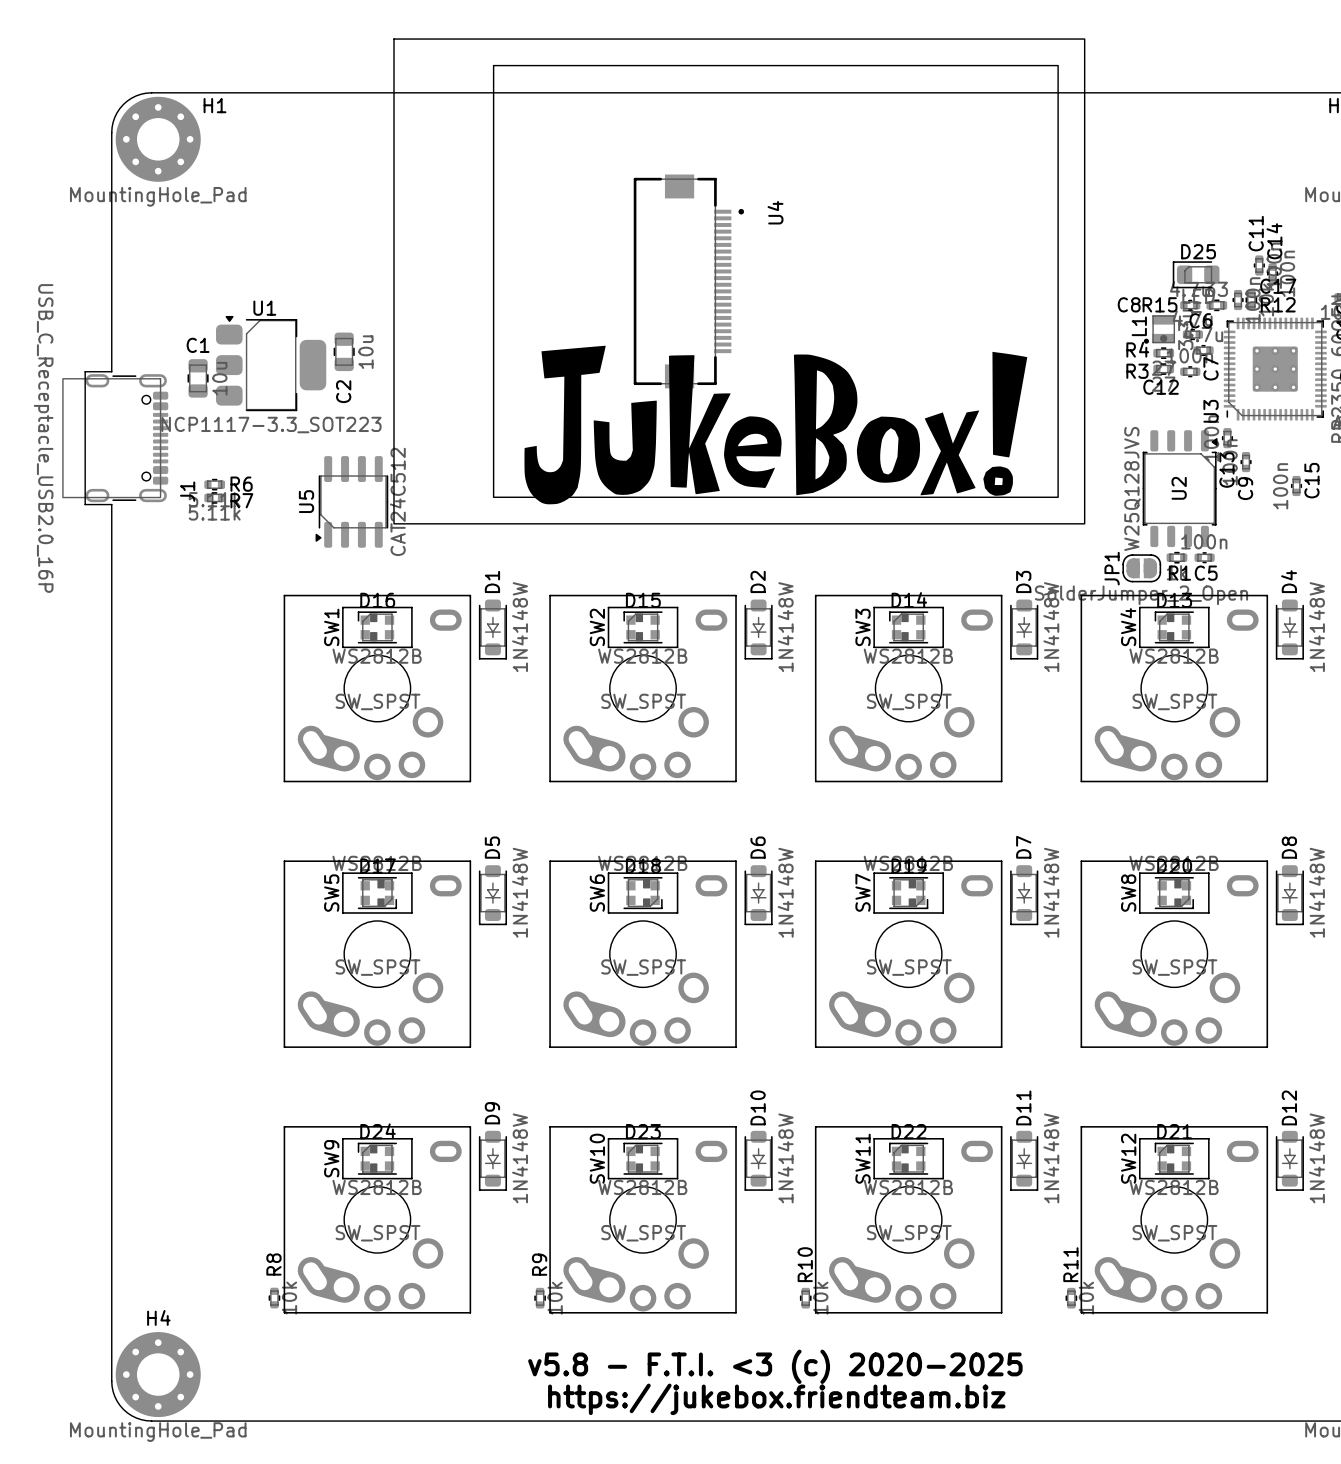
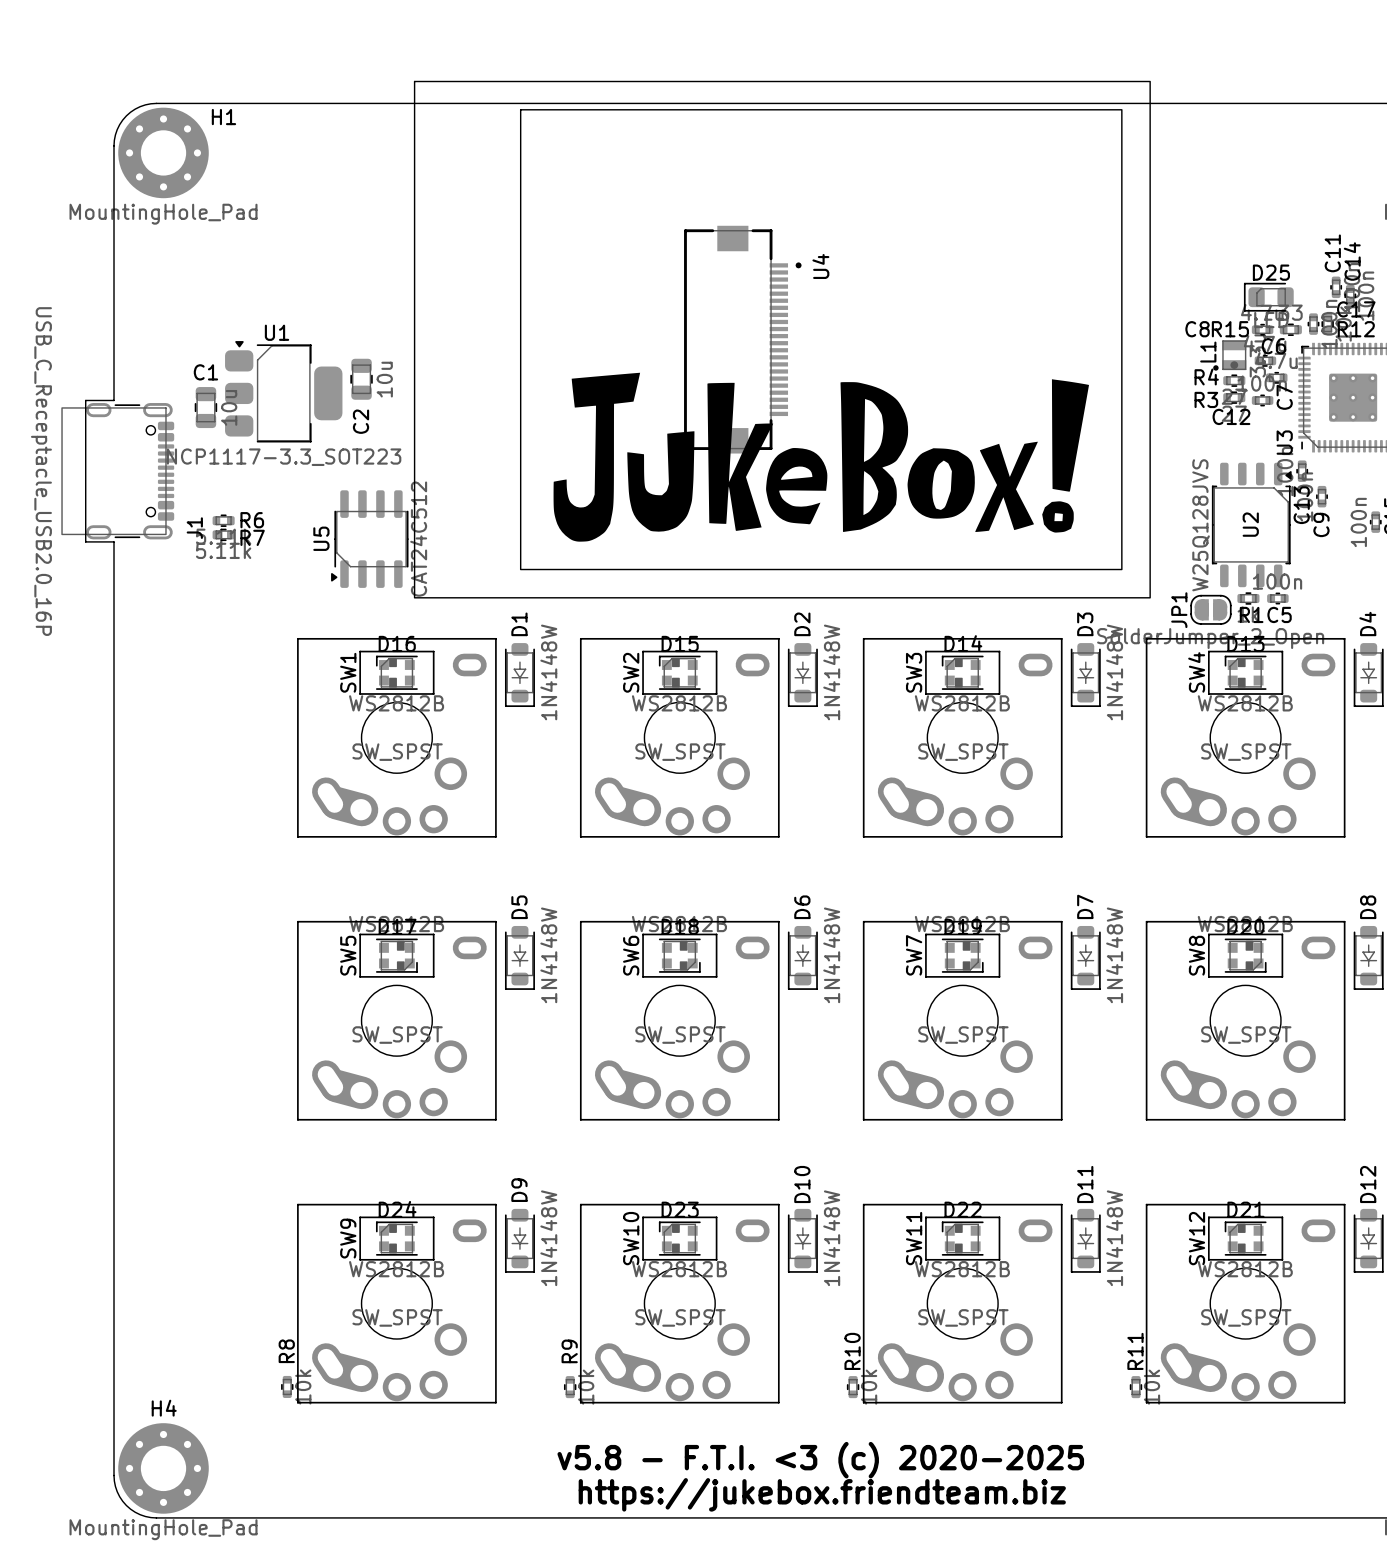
U4 footprint: [393, 38, 1086, 525] -> [413, 80, 1151, 599]

